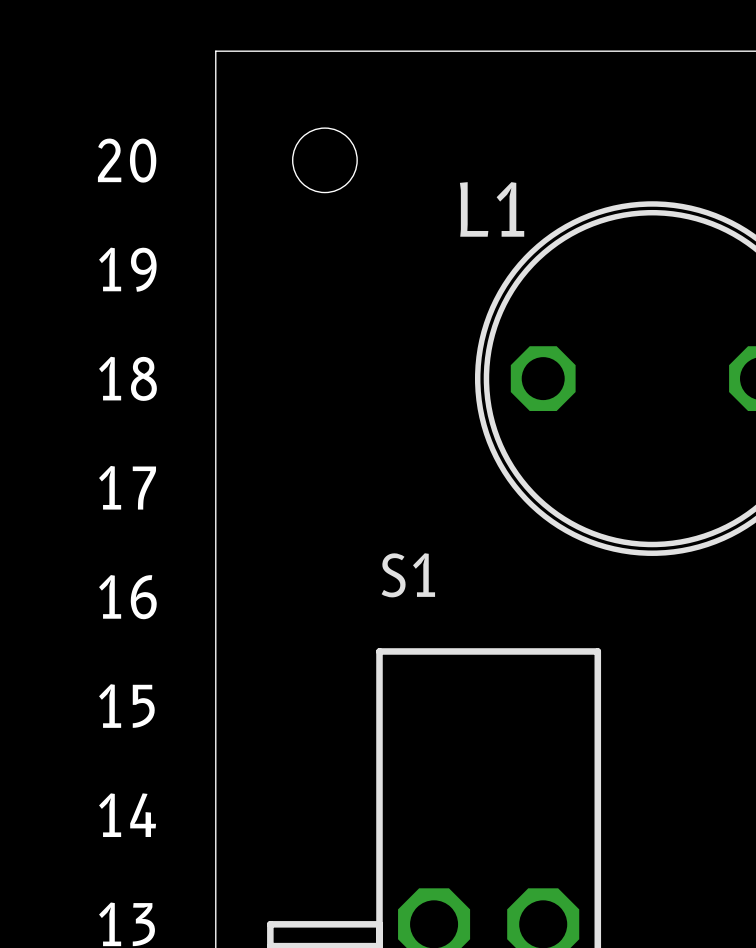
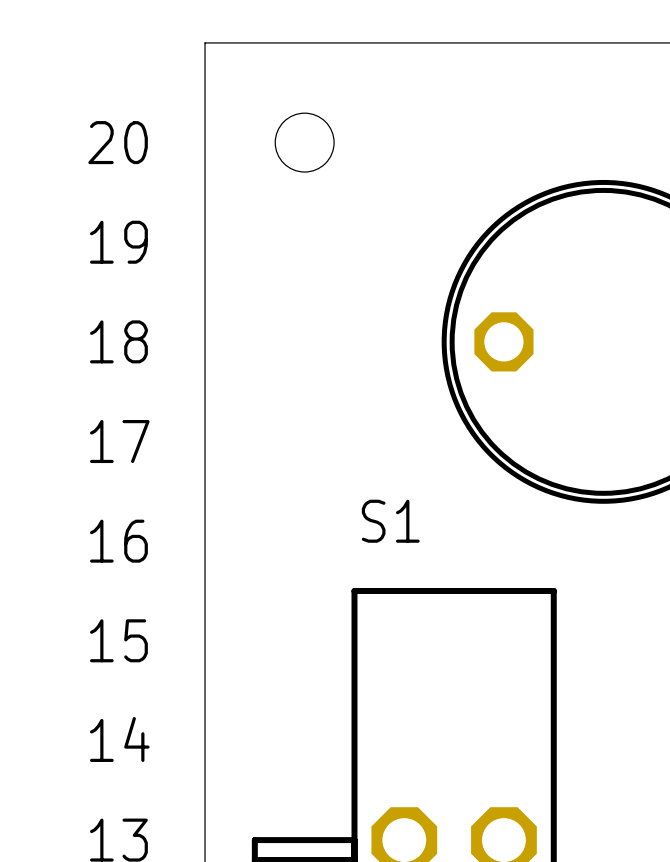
L1 name: L1 (492, 209) -> none

